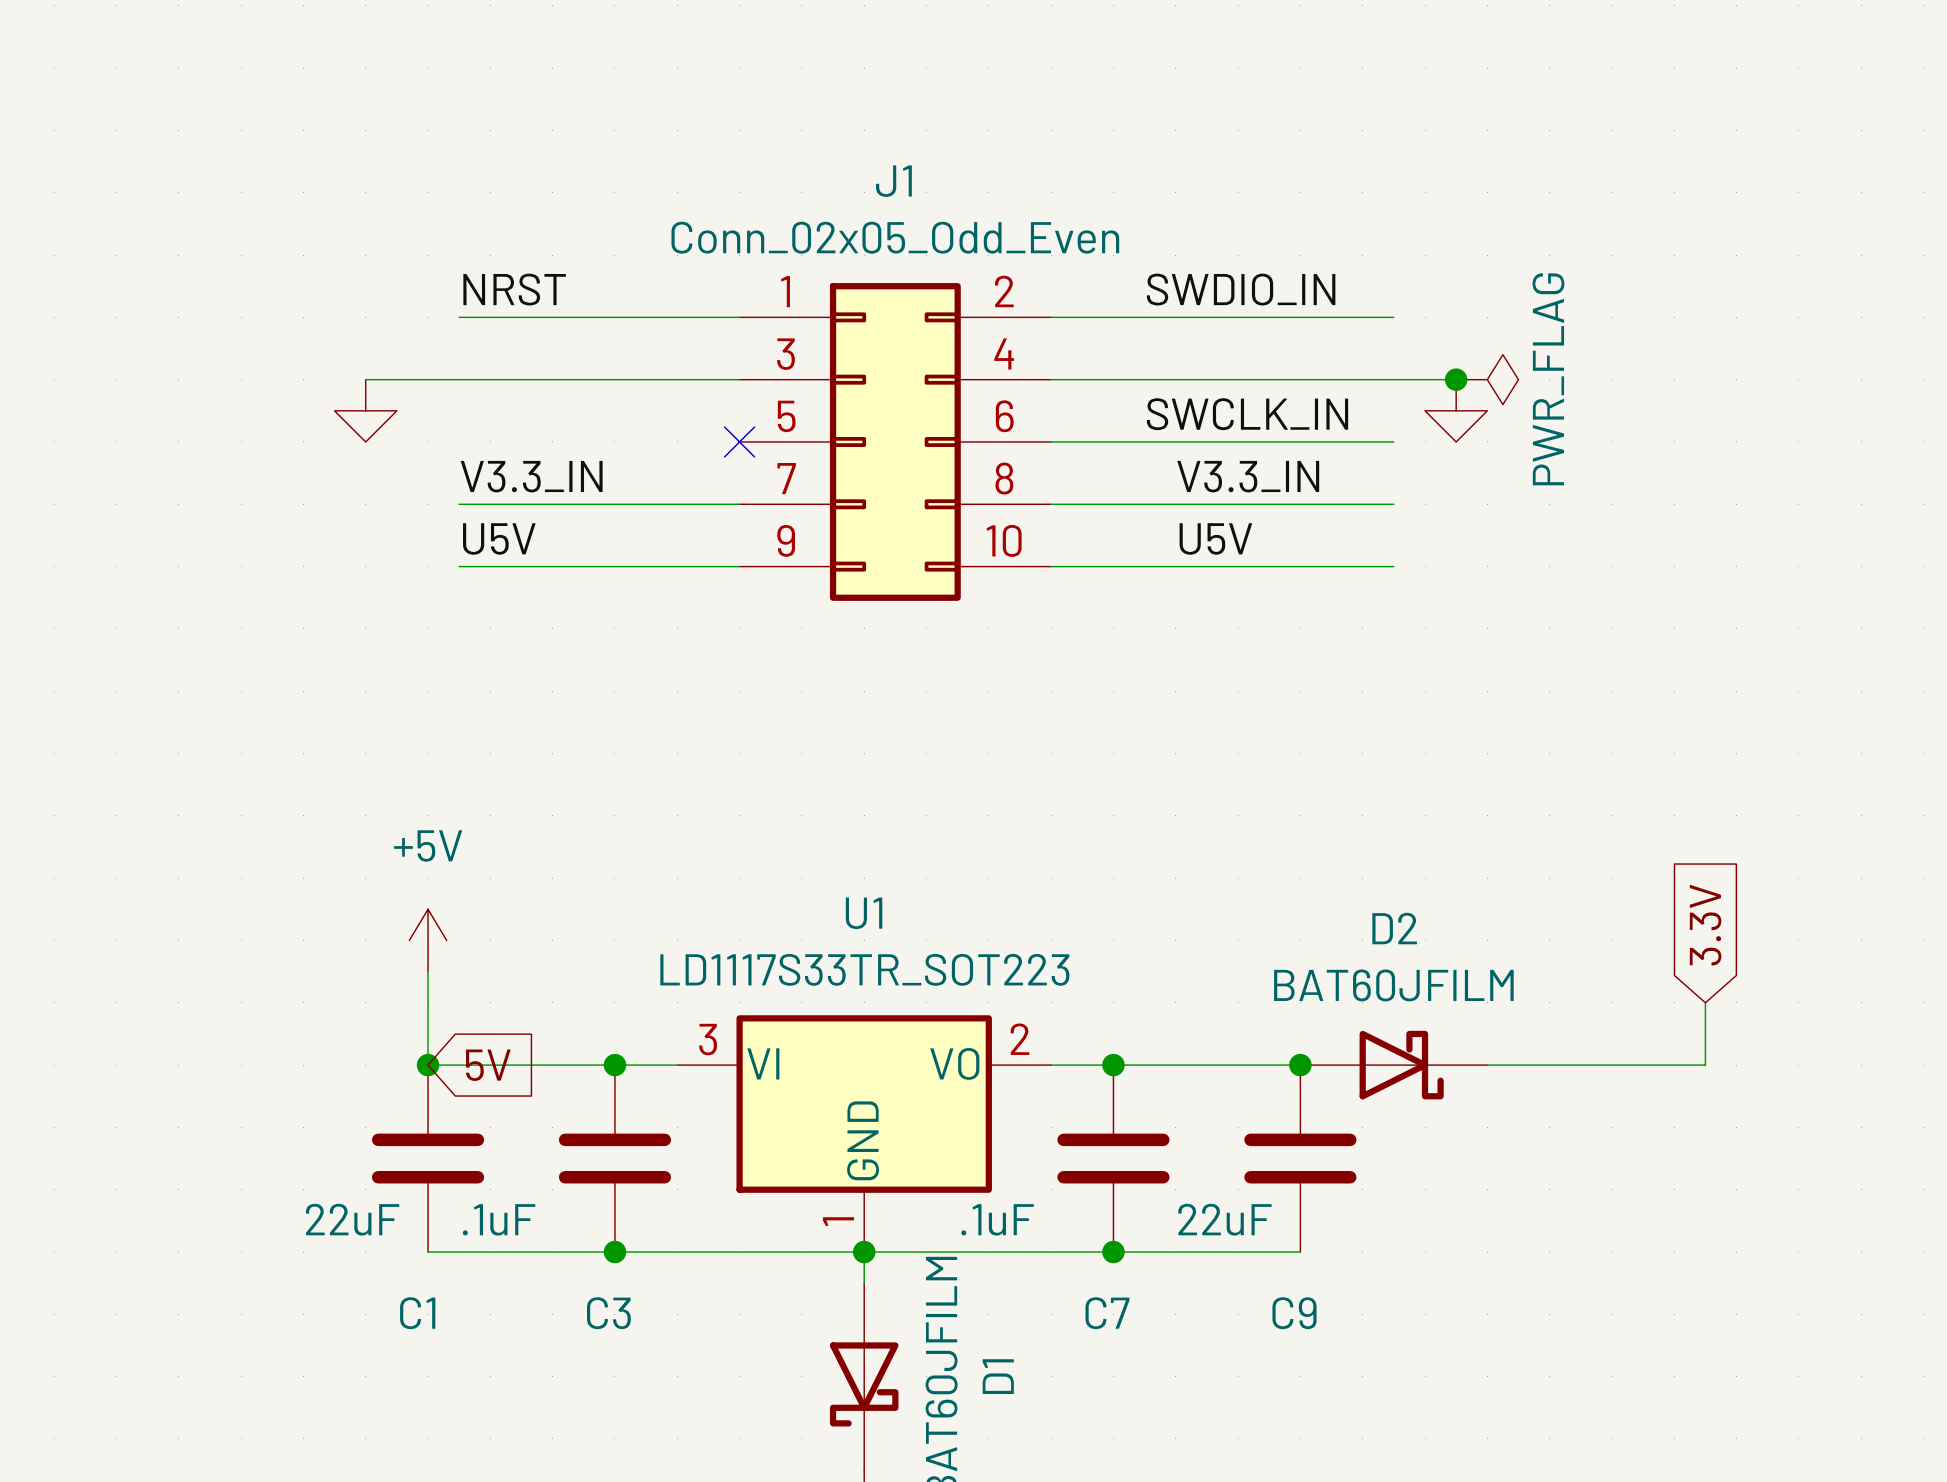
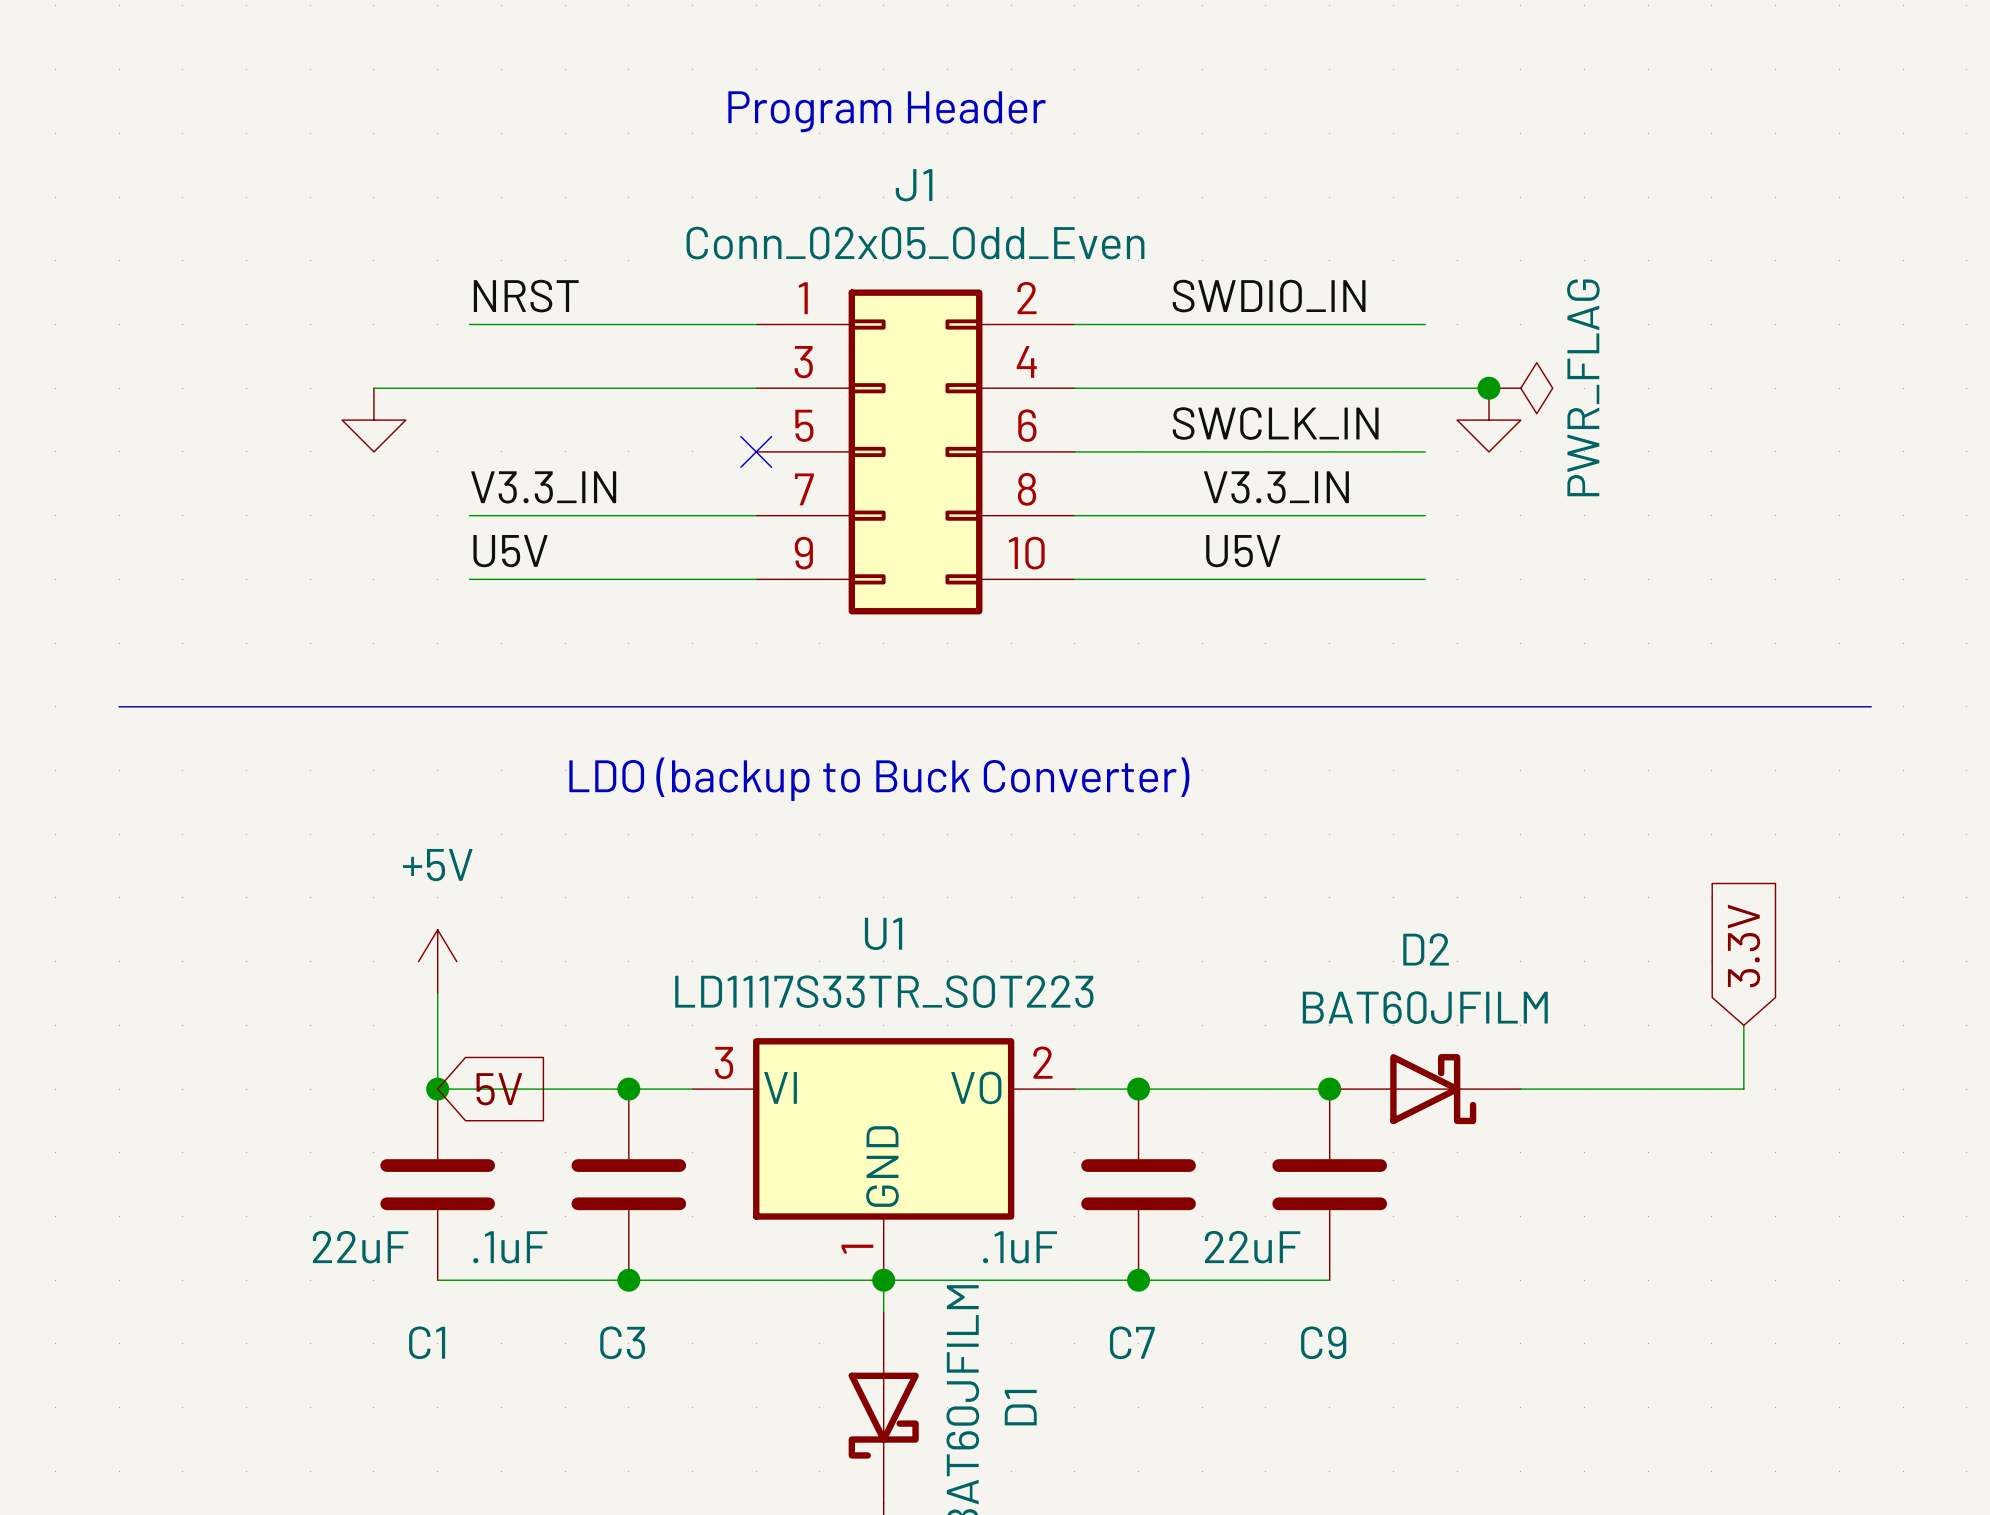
text: none -> Program Header (887, 111)
line: none -> (119, 706) (1871, 706)
text: none -> LDO (backup to Buck Converter) (879, 779)

